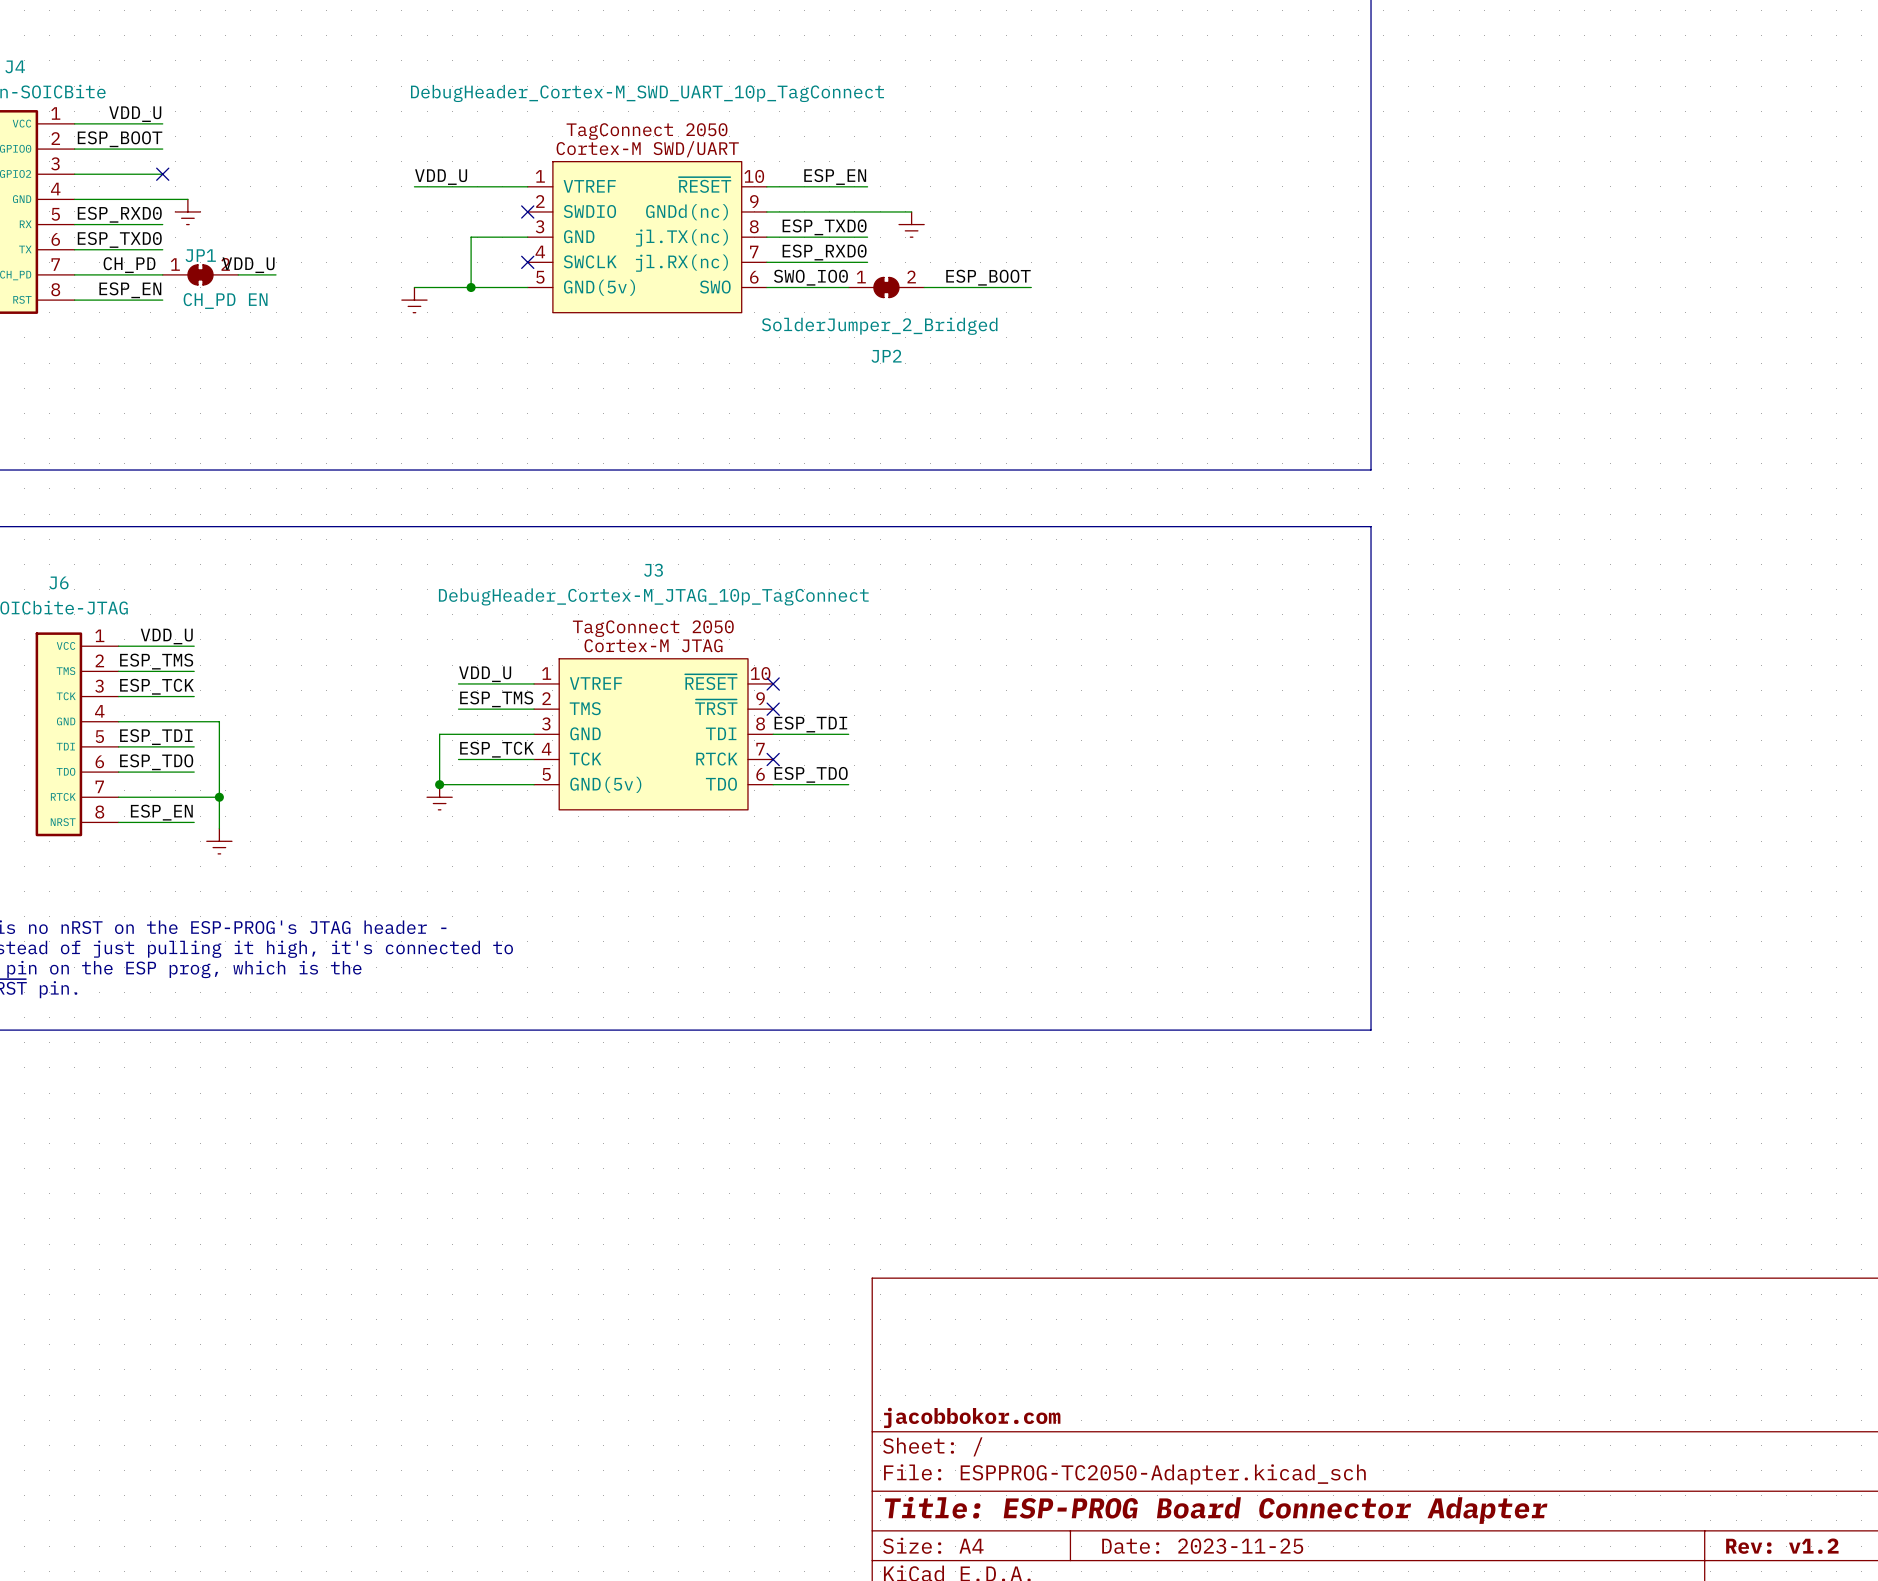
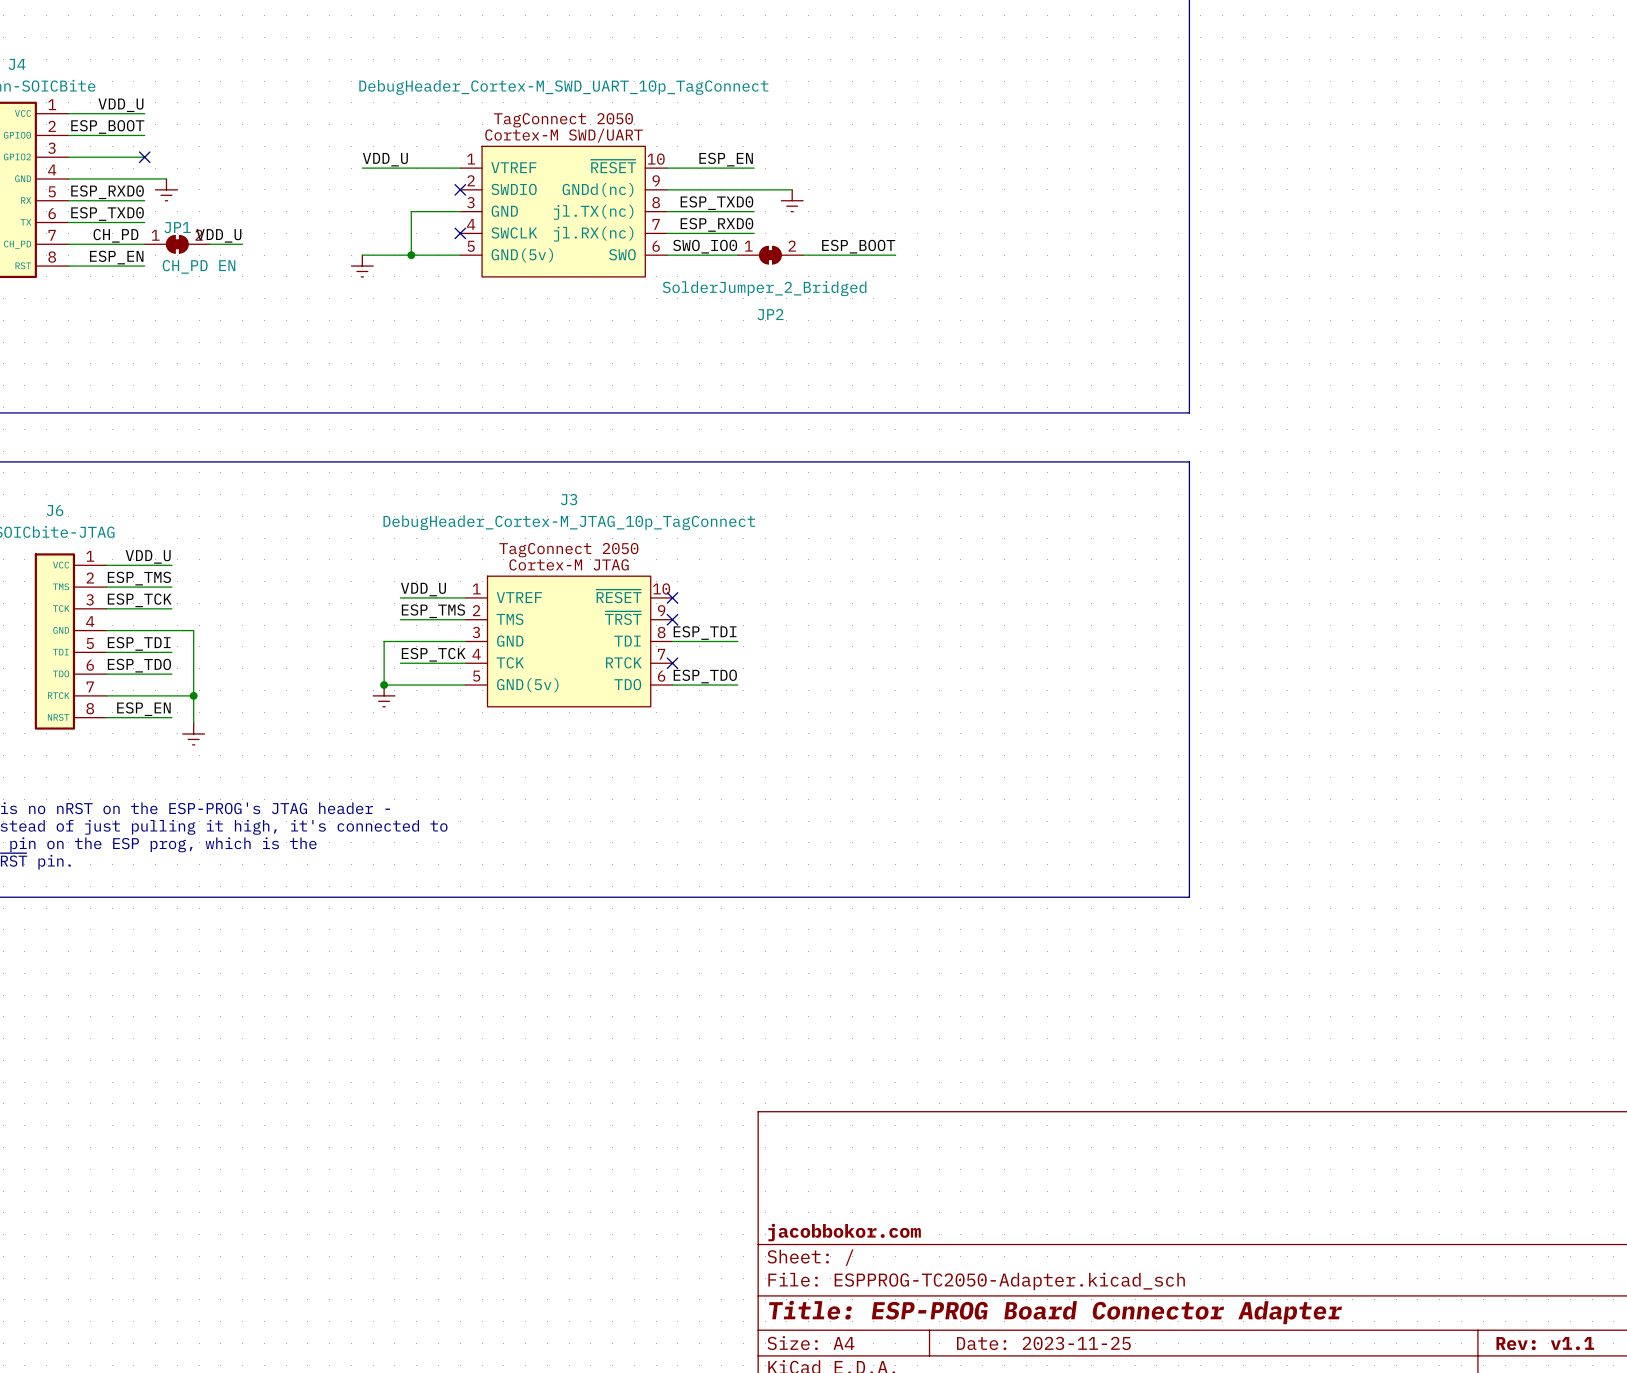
title block: Rev: v1.2 (1782, 1546) -> Rev: v1.1 (1545, 1343)

